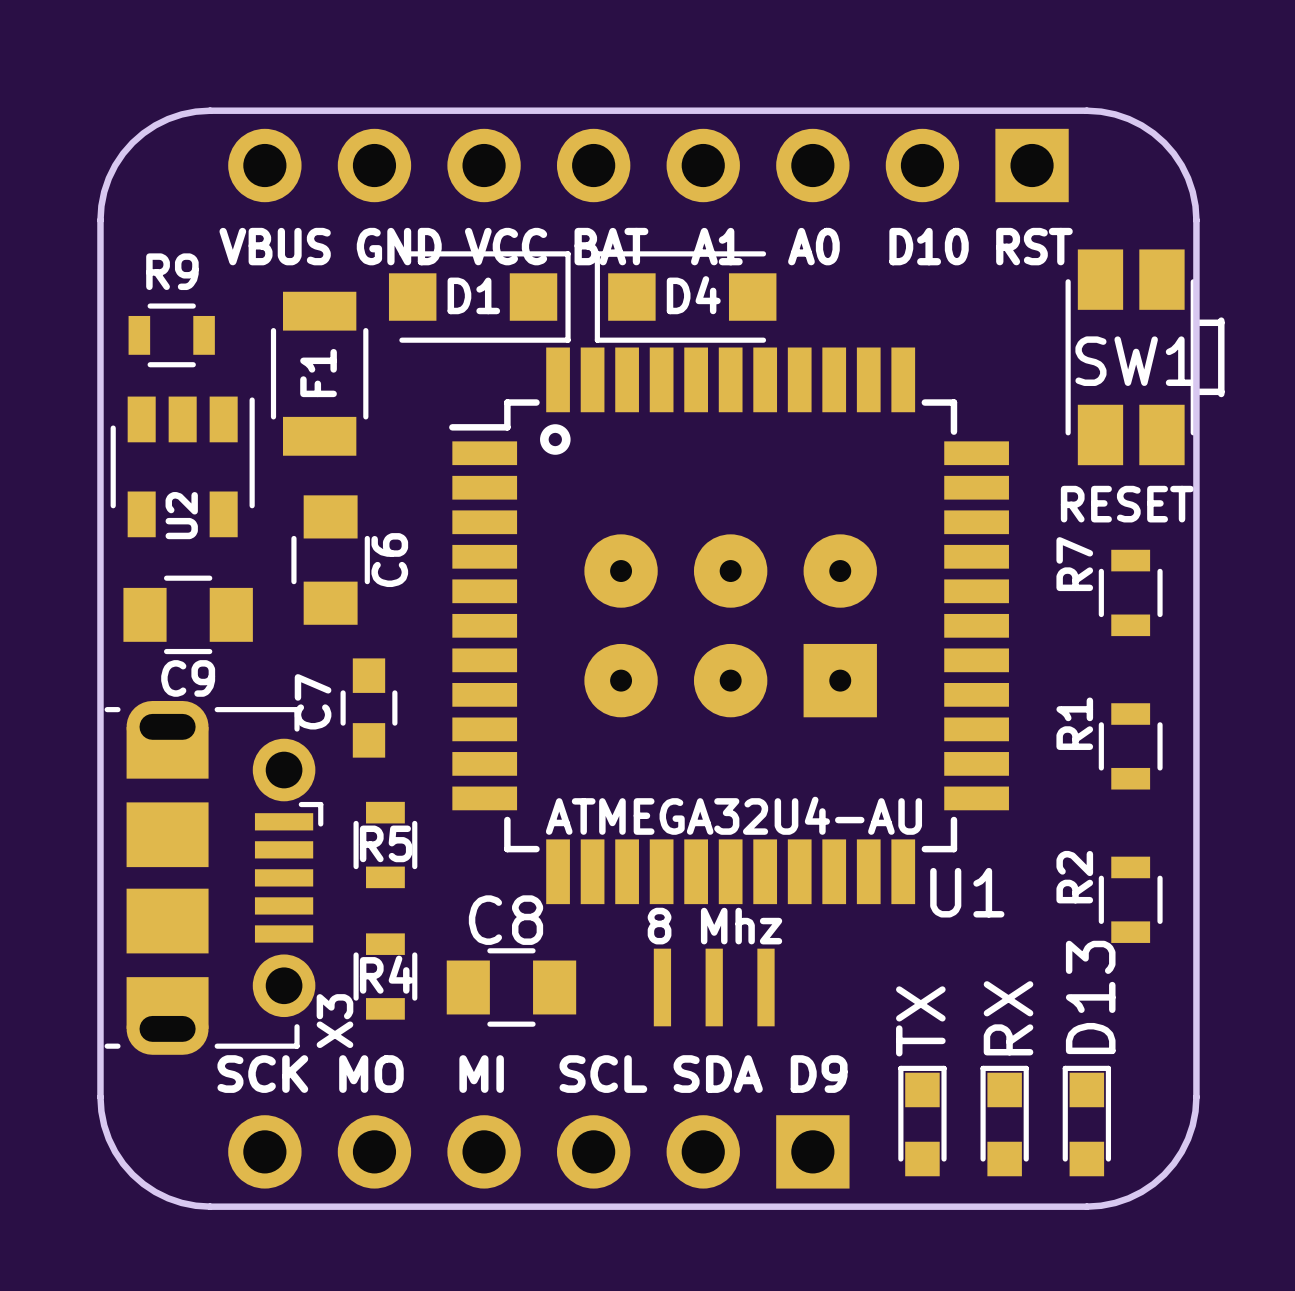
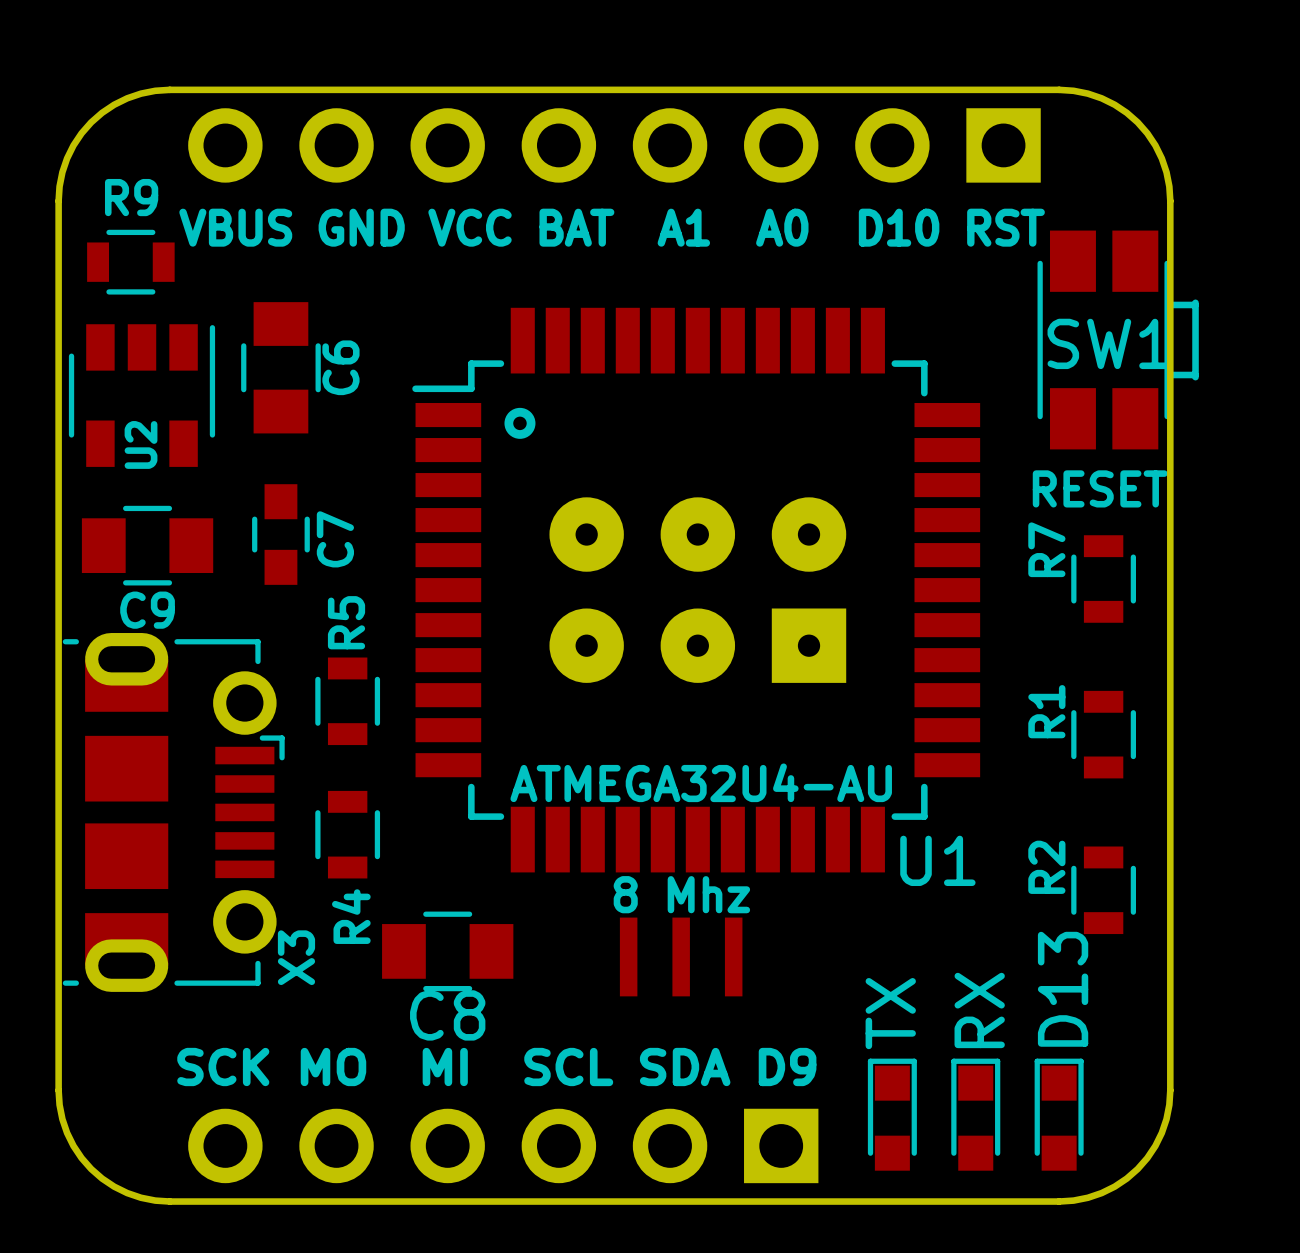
D1: (479, 297) -> none
D4: (685, 297) -> none
R9 position: (171, 335) -> (130, 262)
F1: (319, 373) -> none
U2 position: (182, 466) -> (141, 395)
C6 position: (330, 560) -> (280, 367)
C9 position: (188, 614) -> (147, 545)
U1 position: (729, 625) -> (696, 590)
part position: (730, 625) -> (697, 590)
C7 name position: C7 (313, 701) -> C7 (335, 539)
C7 position: (368, 708) -> (280, 534)
R5: none -> (347, 701)
R5 name: R5 (386, 843) -> R4 (351, 916)
X3 position: (213, 877) -> (173, 812)
C8 name position: C8 (505, 920) -> C8 (447, 1015)
R4: (385, 976) -> none
C8 position: (511, 987) -> (447, 951)
part position: (714, 987) -> (681, 956)

